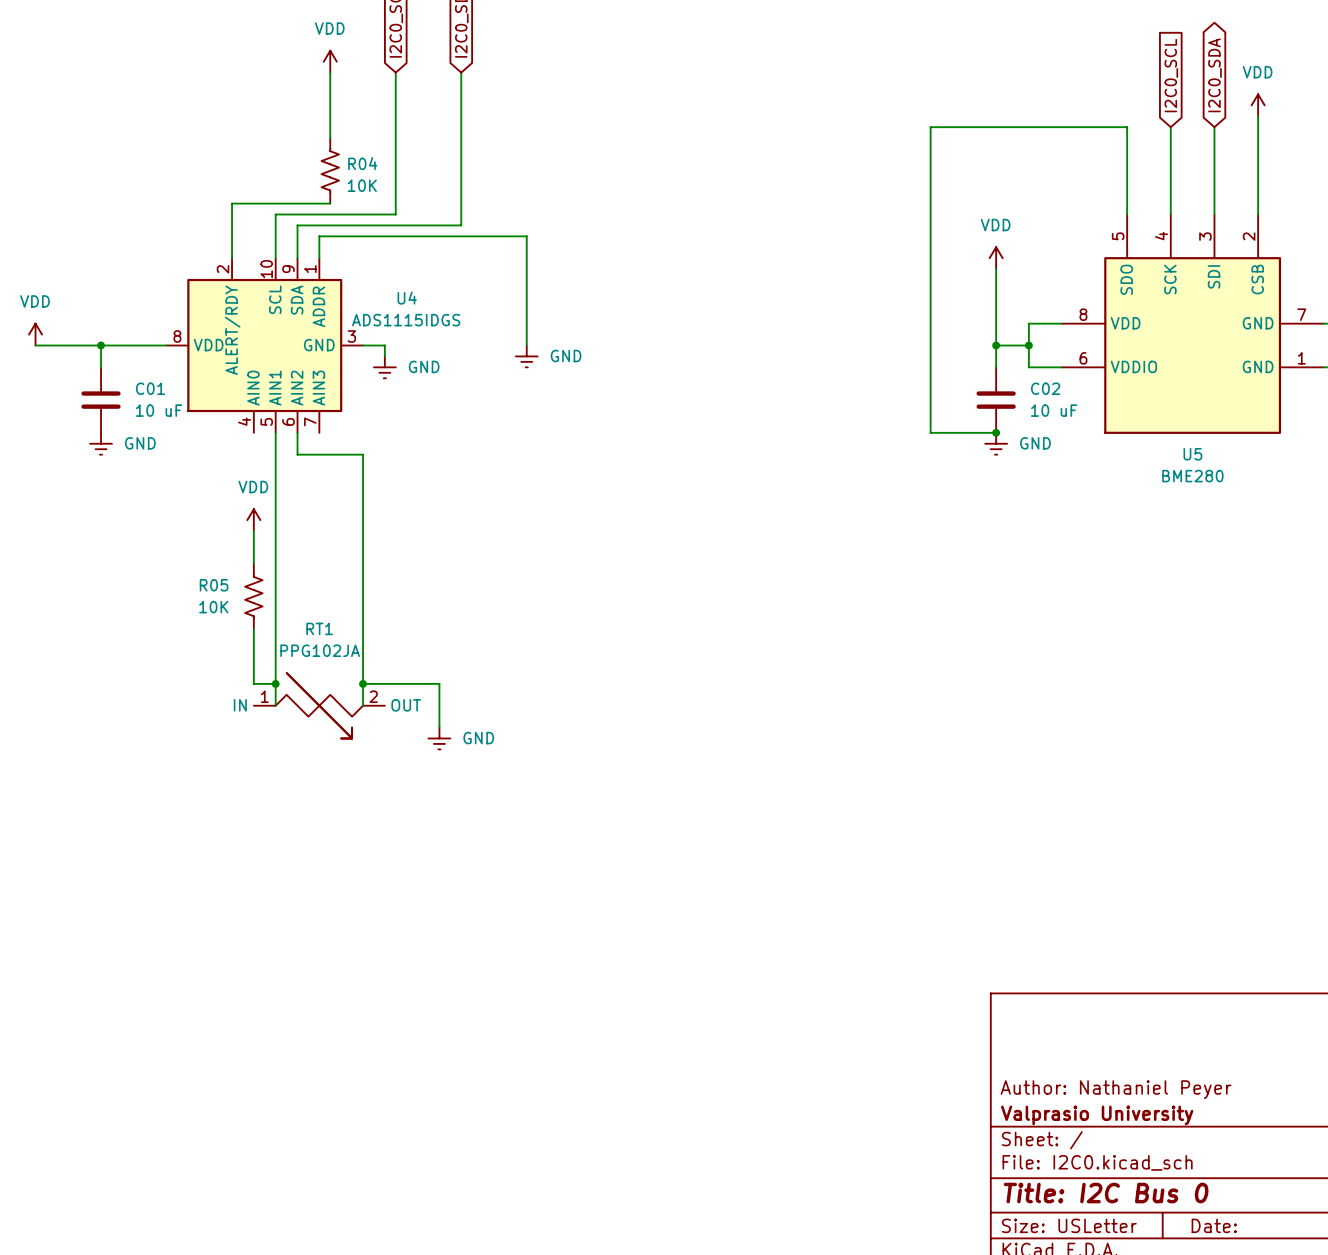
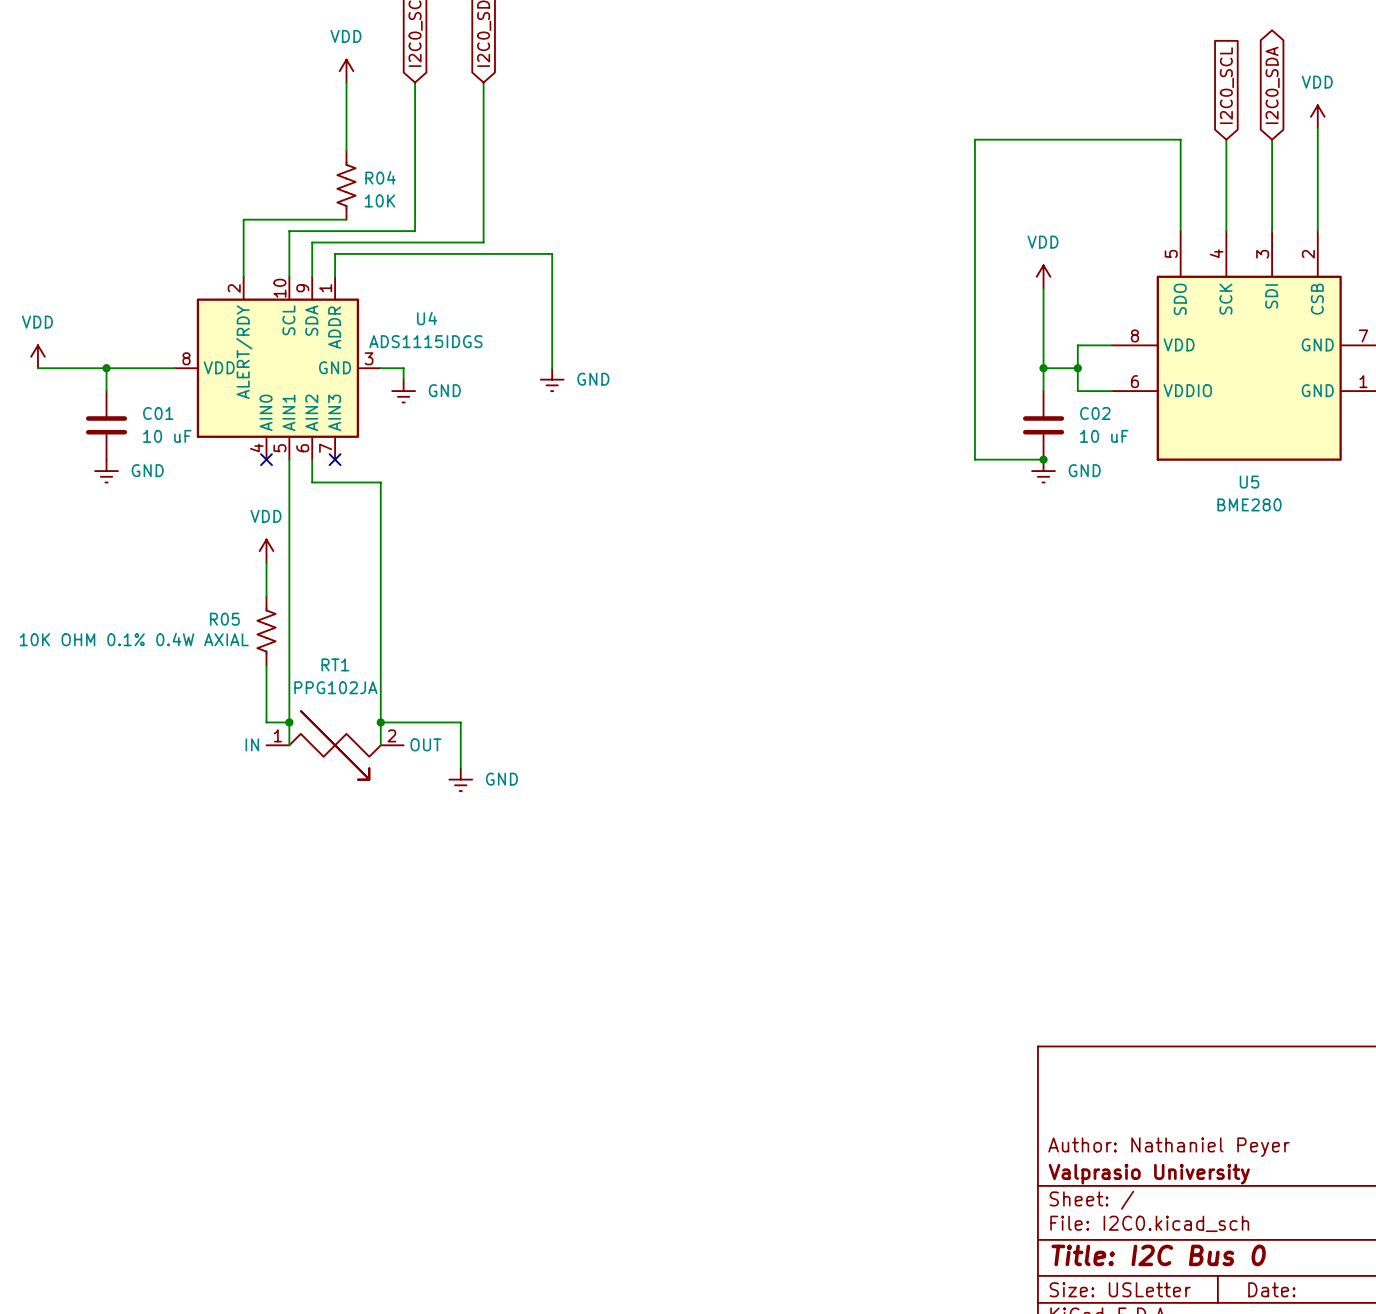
no-connect mark: none -> (266, 459)
no-connect mark: none -> (335, 459)
R05 value: 10K (213, 607) -> 10K OHM 0.1% 0.4W AXIAL (134, 639)

